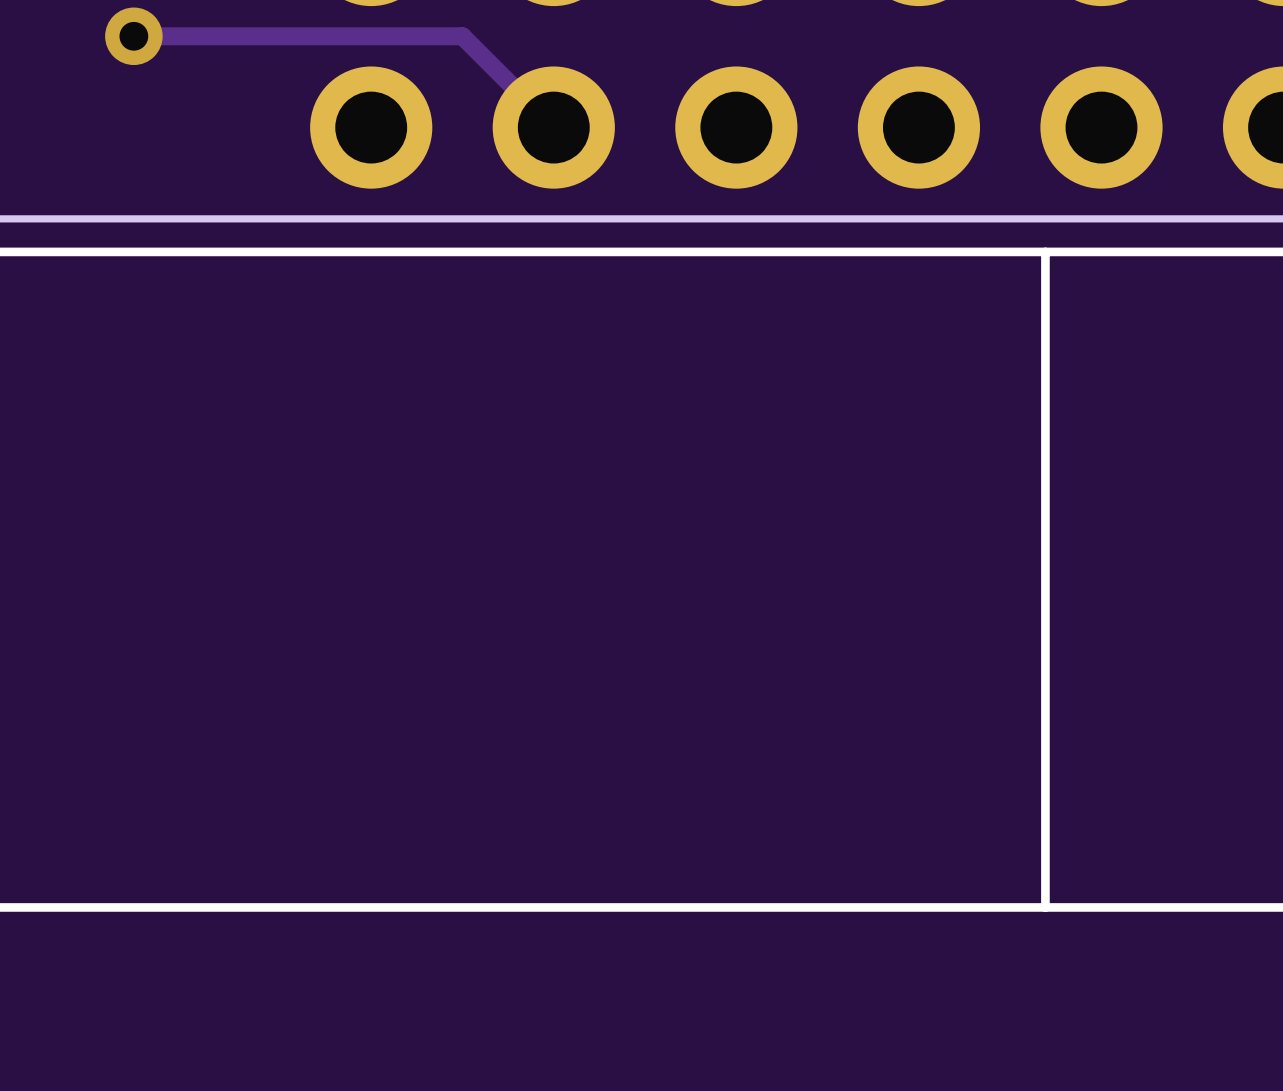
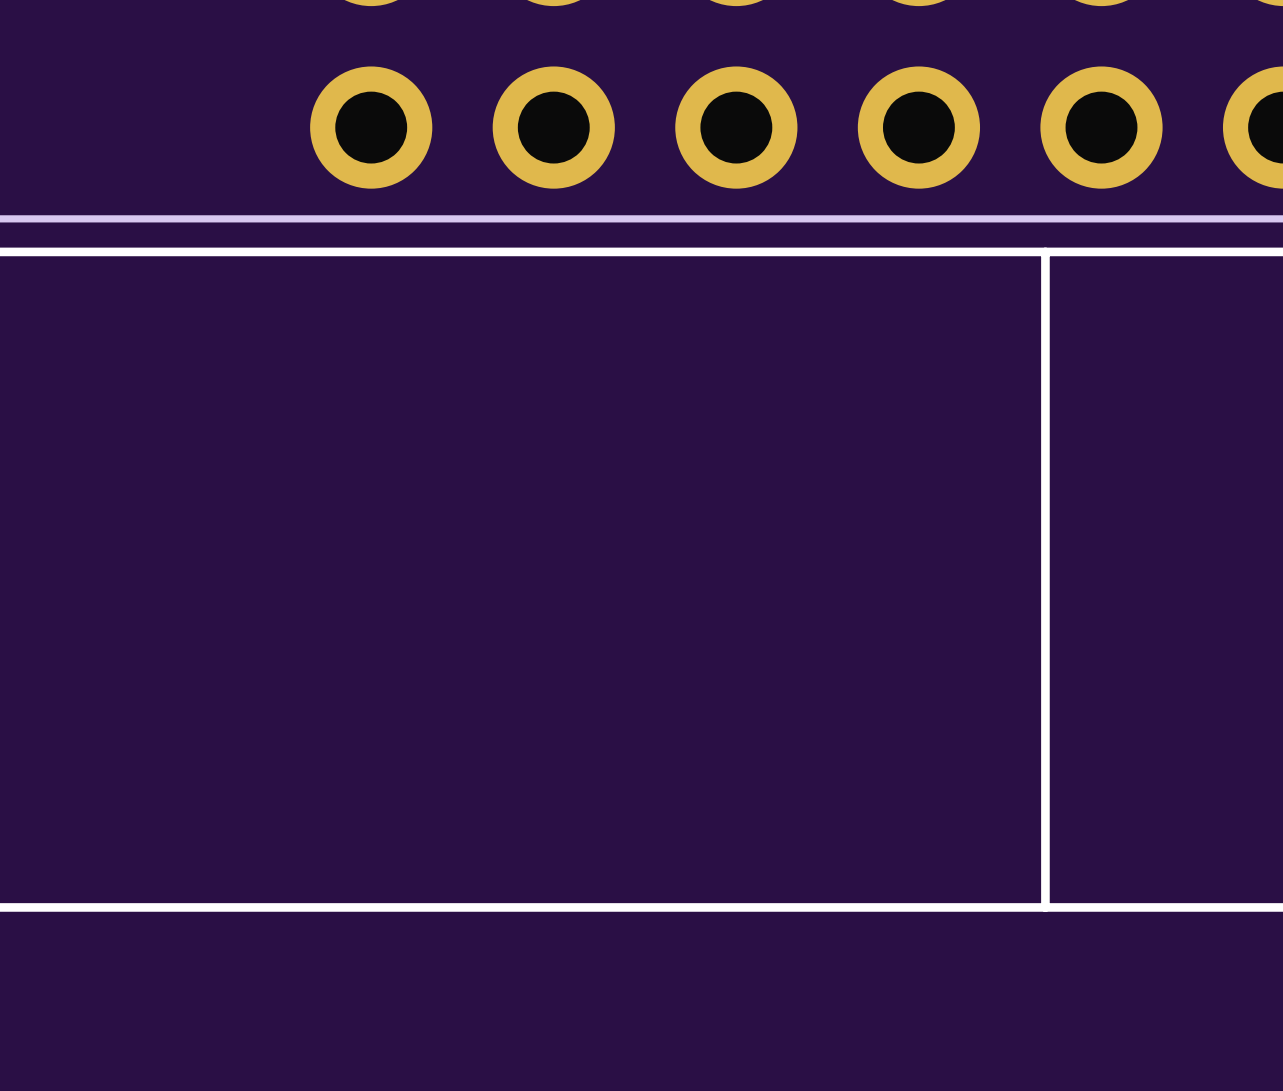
track: (133, 36) (462, 36) (553, 127) -> none
via: (133, 36) -> none

